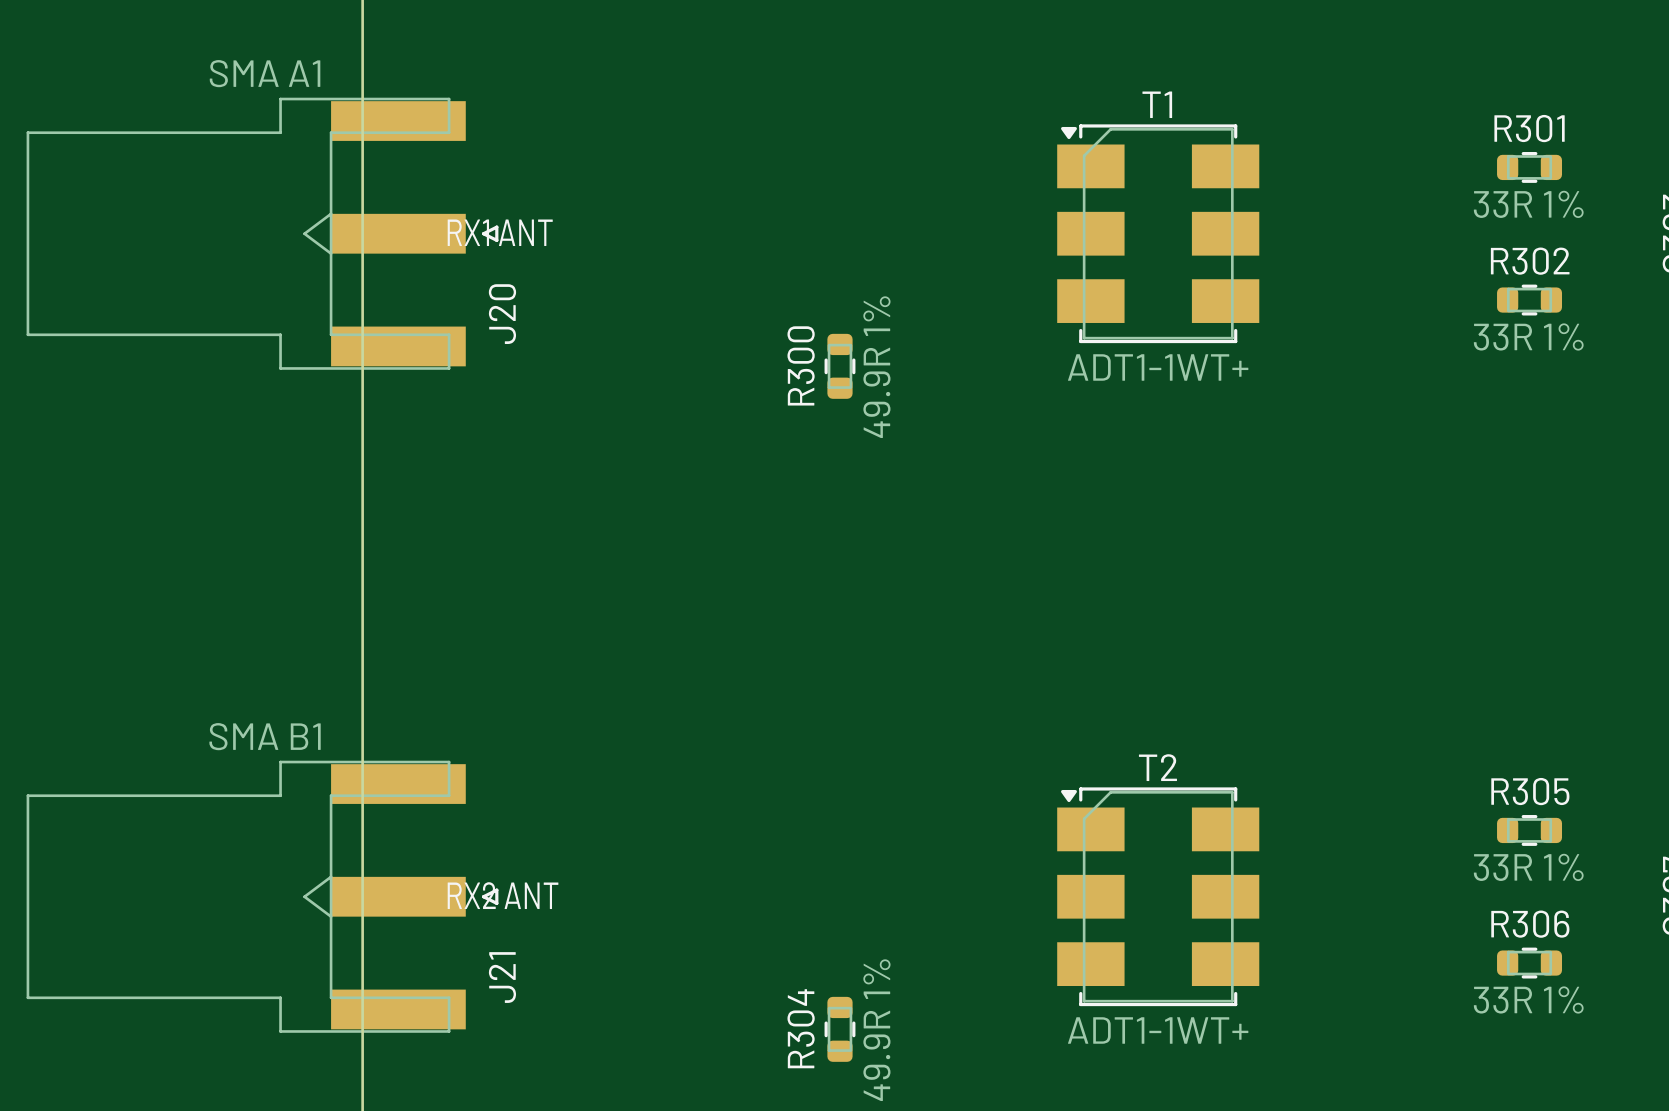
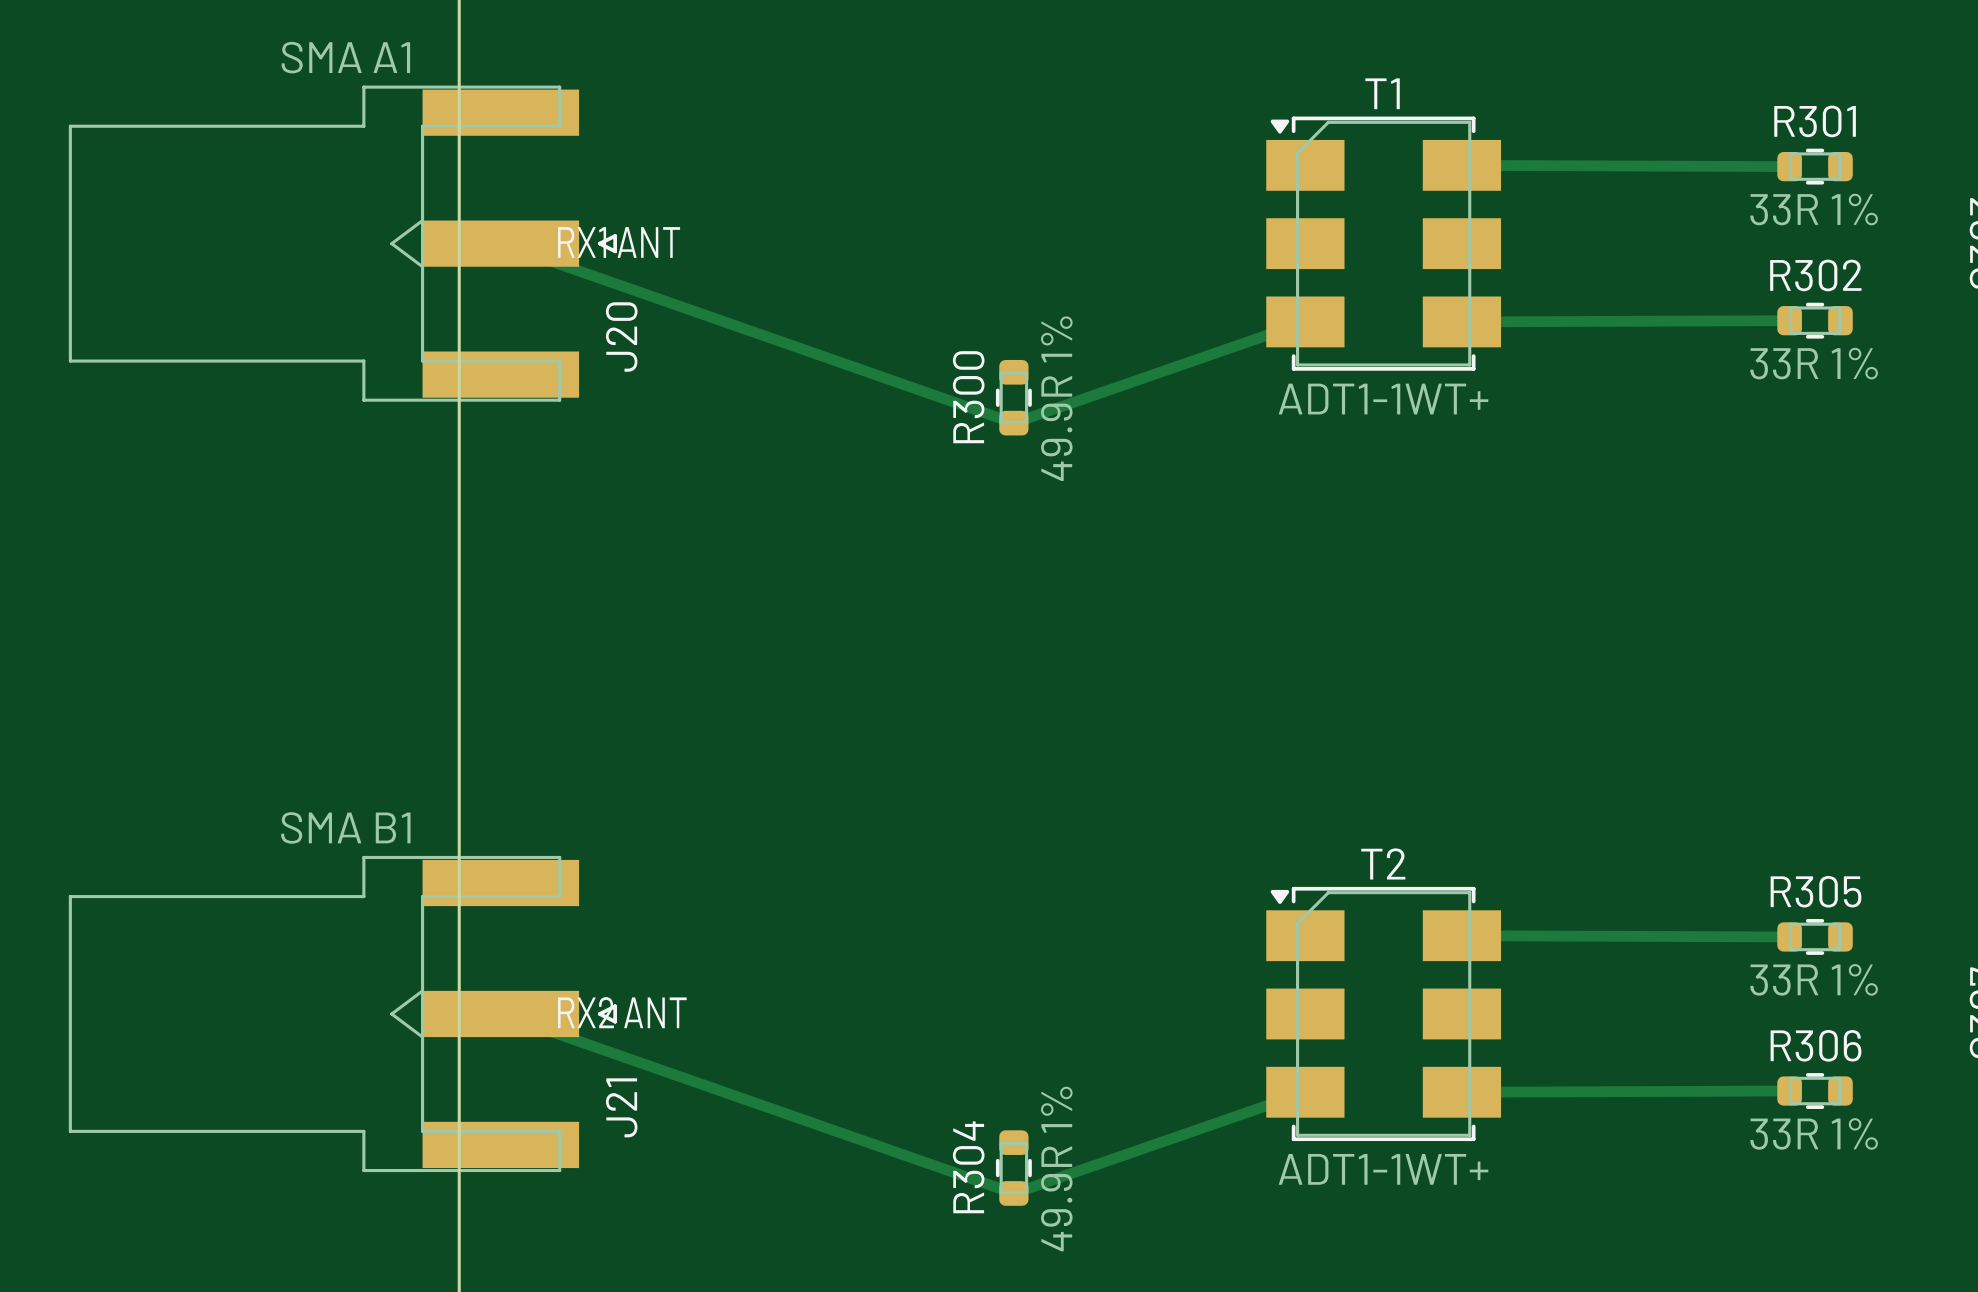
track: none -> (1461, 165) (1789, 166)
track: none -> (500, 243) (1013, 423) (1305, 321)
track: none -> (1789, 320) (1461, 321)
track: none -> (1461, 935) (1789, 936)
track: none -> (500, 1013) (1013, 1193) (1305, 1092)
track: none -> (1789, 1091) (1461, 1092)

